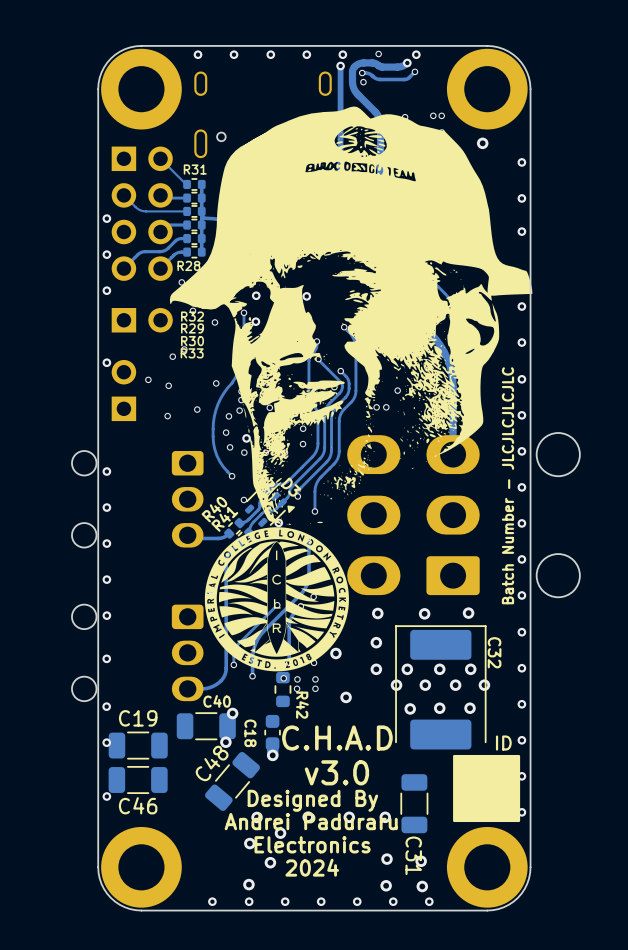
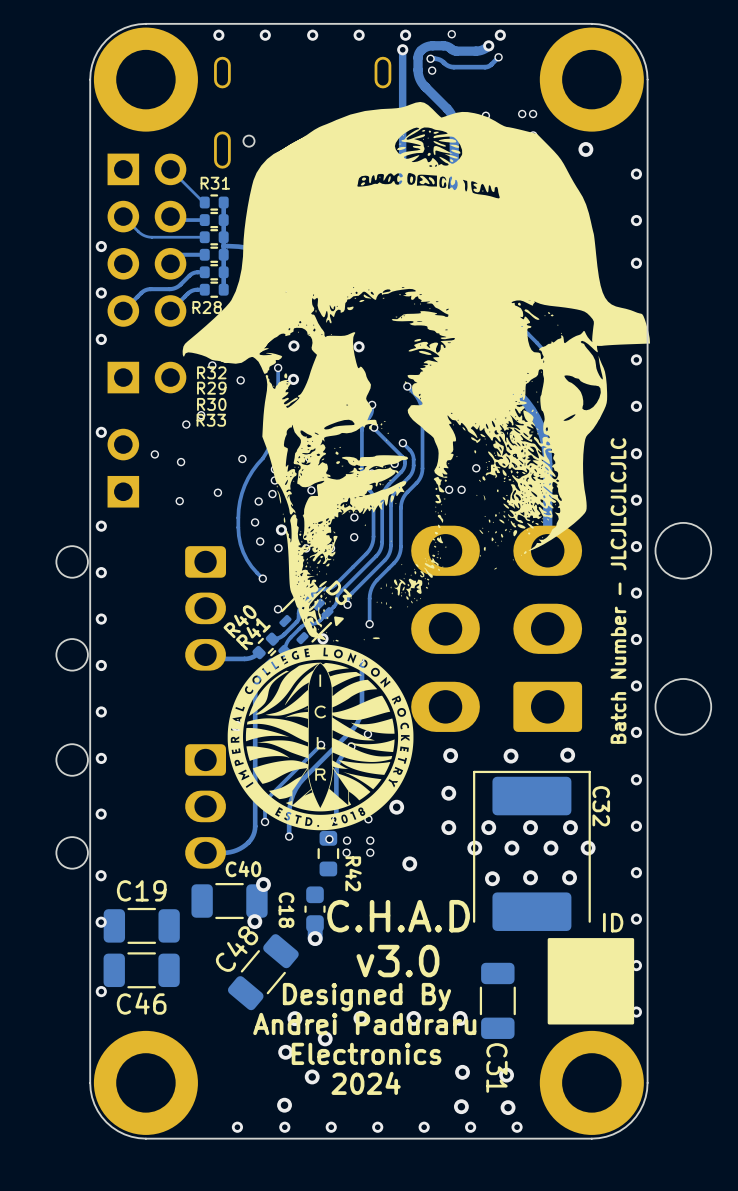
via: (181, 282) -> none
via: none -> (101, 526)

